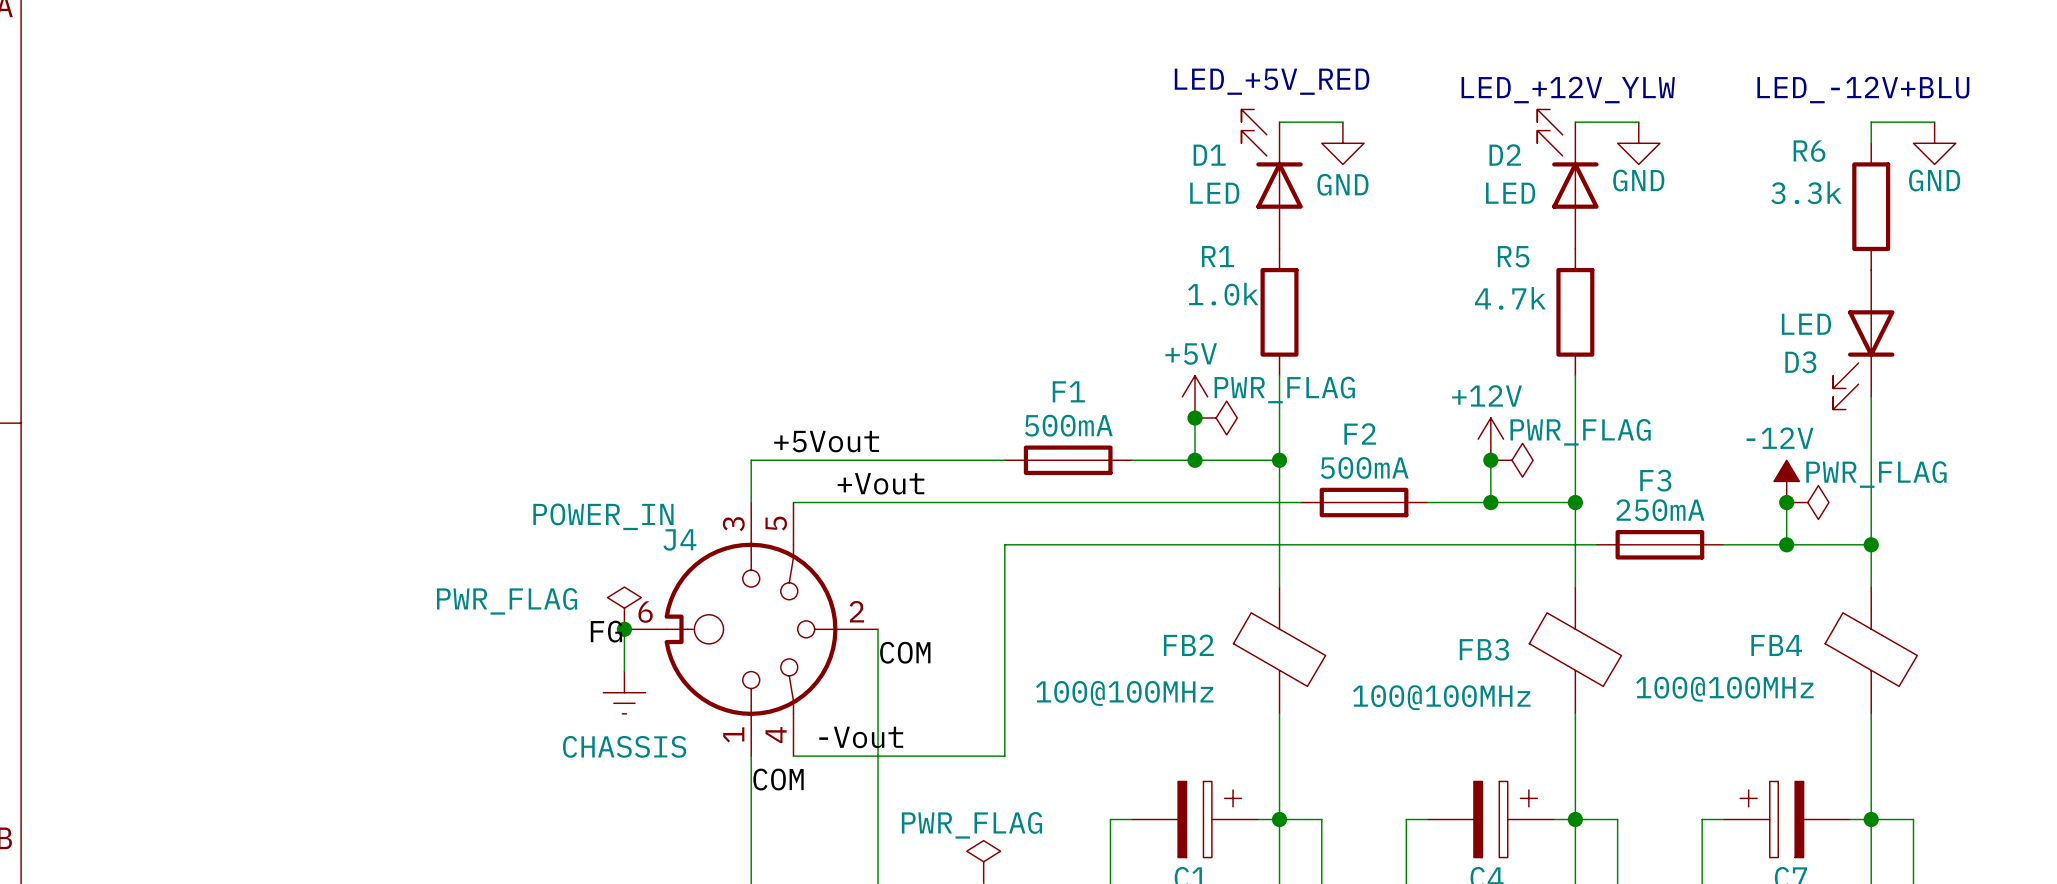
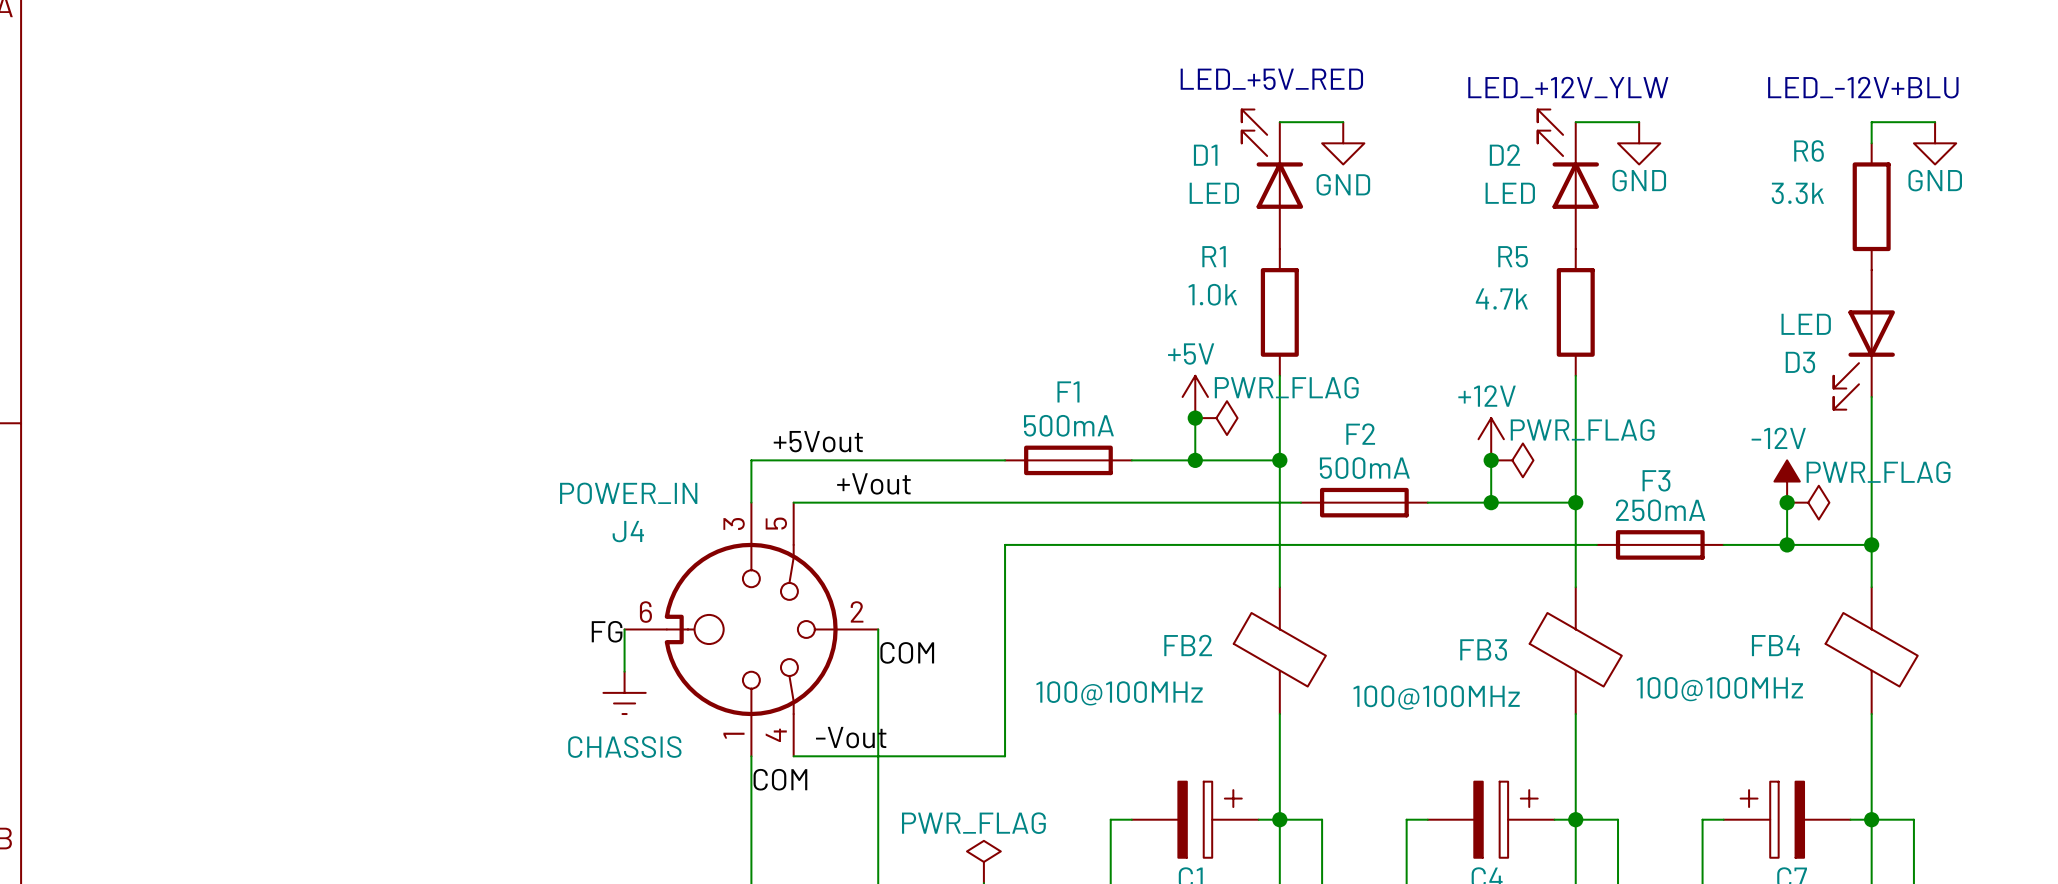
J4 value position: POWER_IN (603, 516) -> POWER_IN (628, 493)
J4 name position: J4 (679, 539) -> J4 (628, 531)
power symbol: PWR_FLAG (624, 608) -> none
junction: (624, 629) -> none

